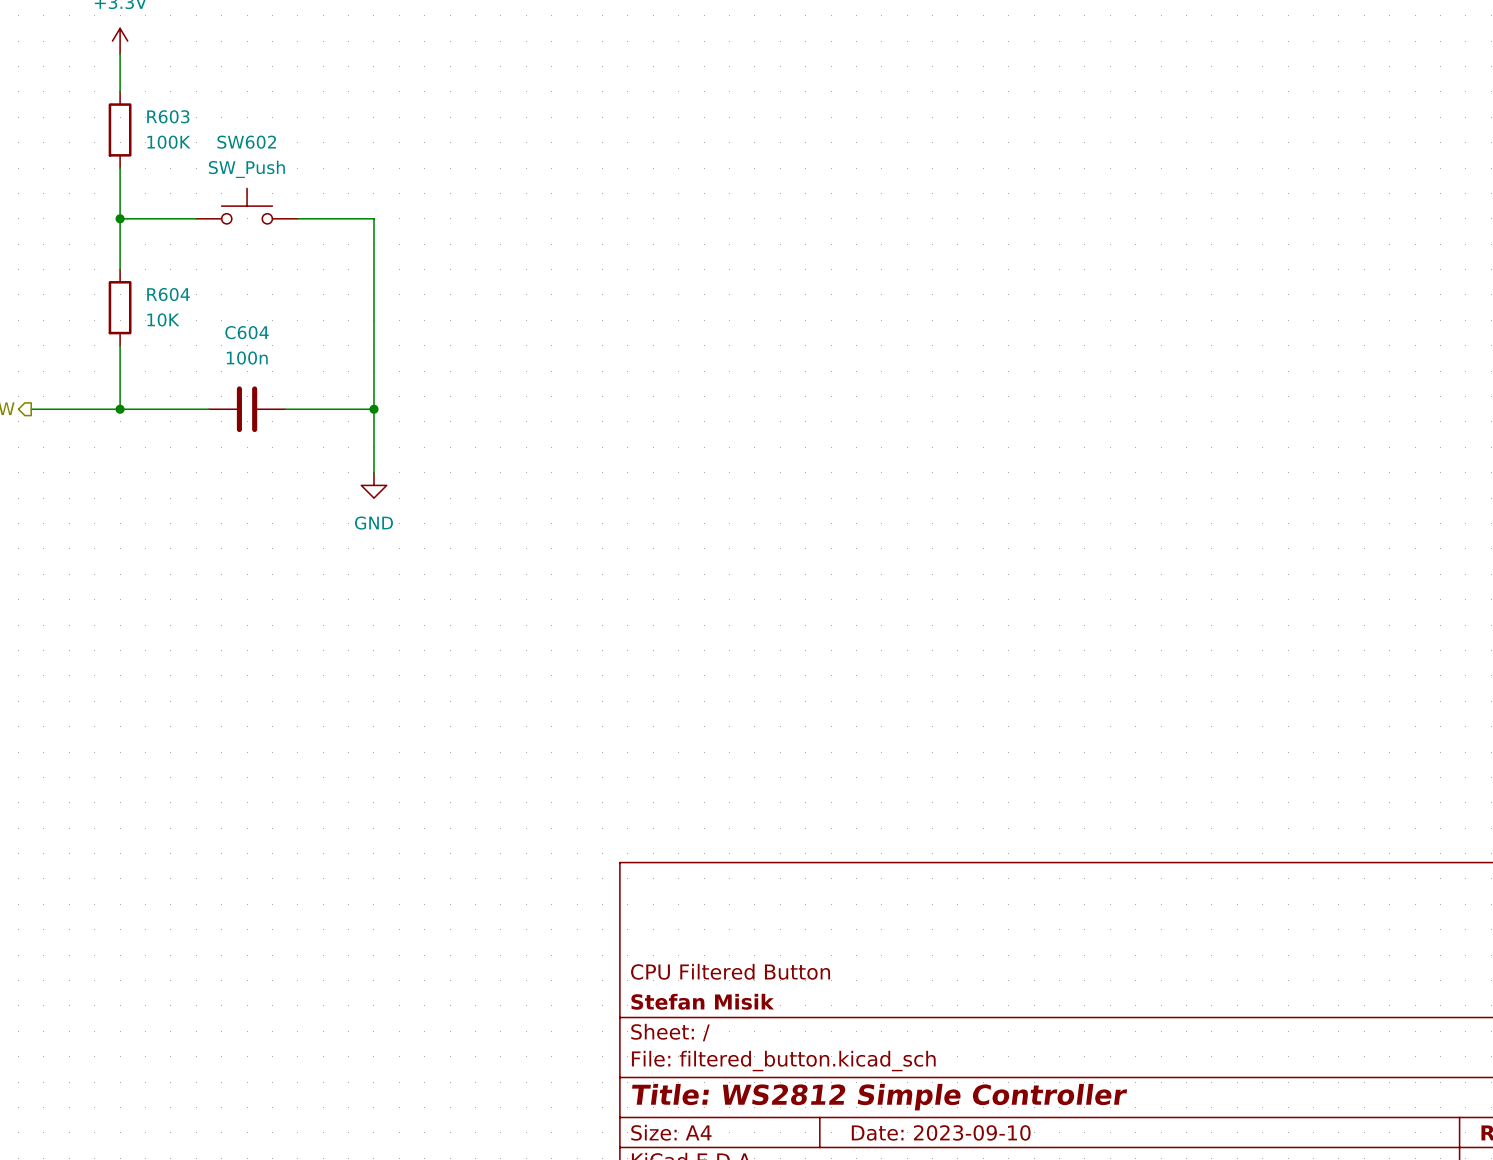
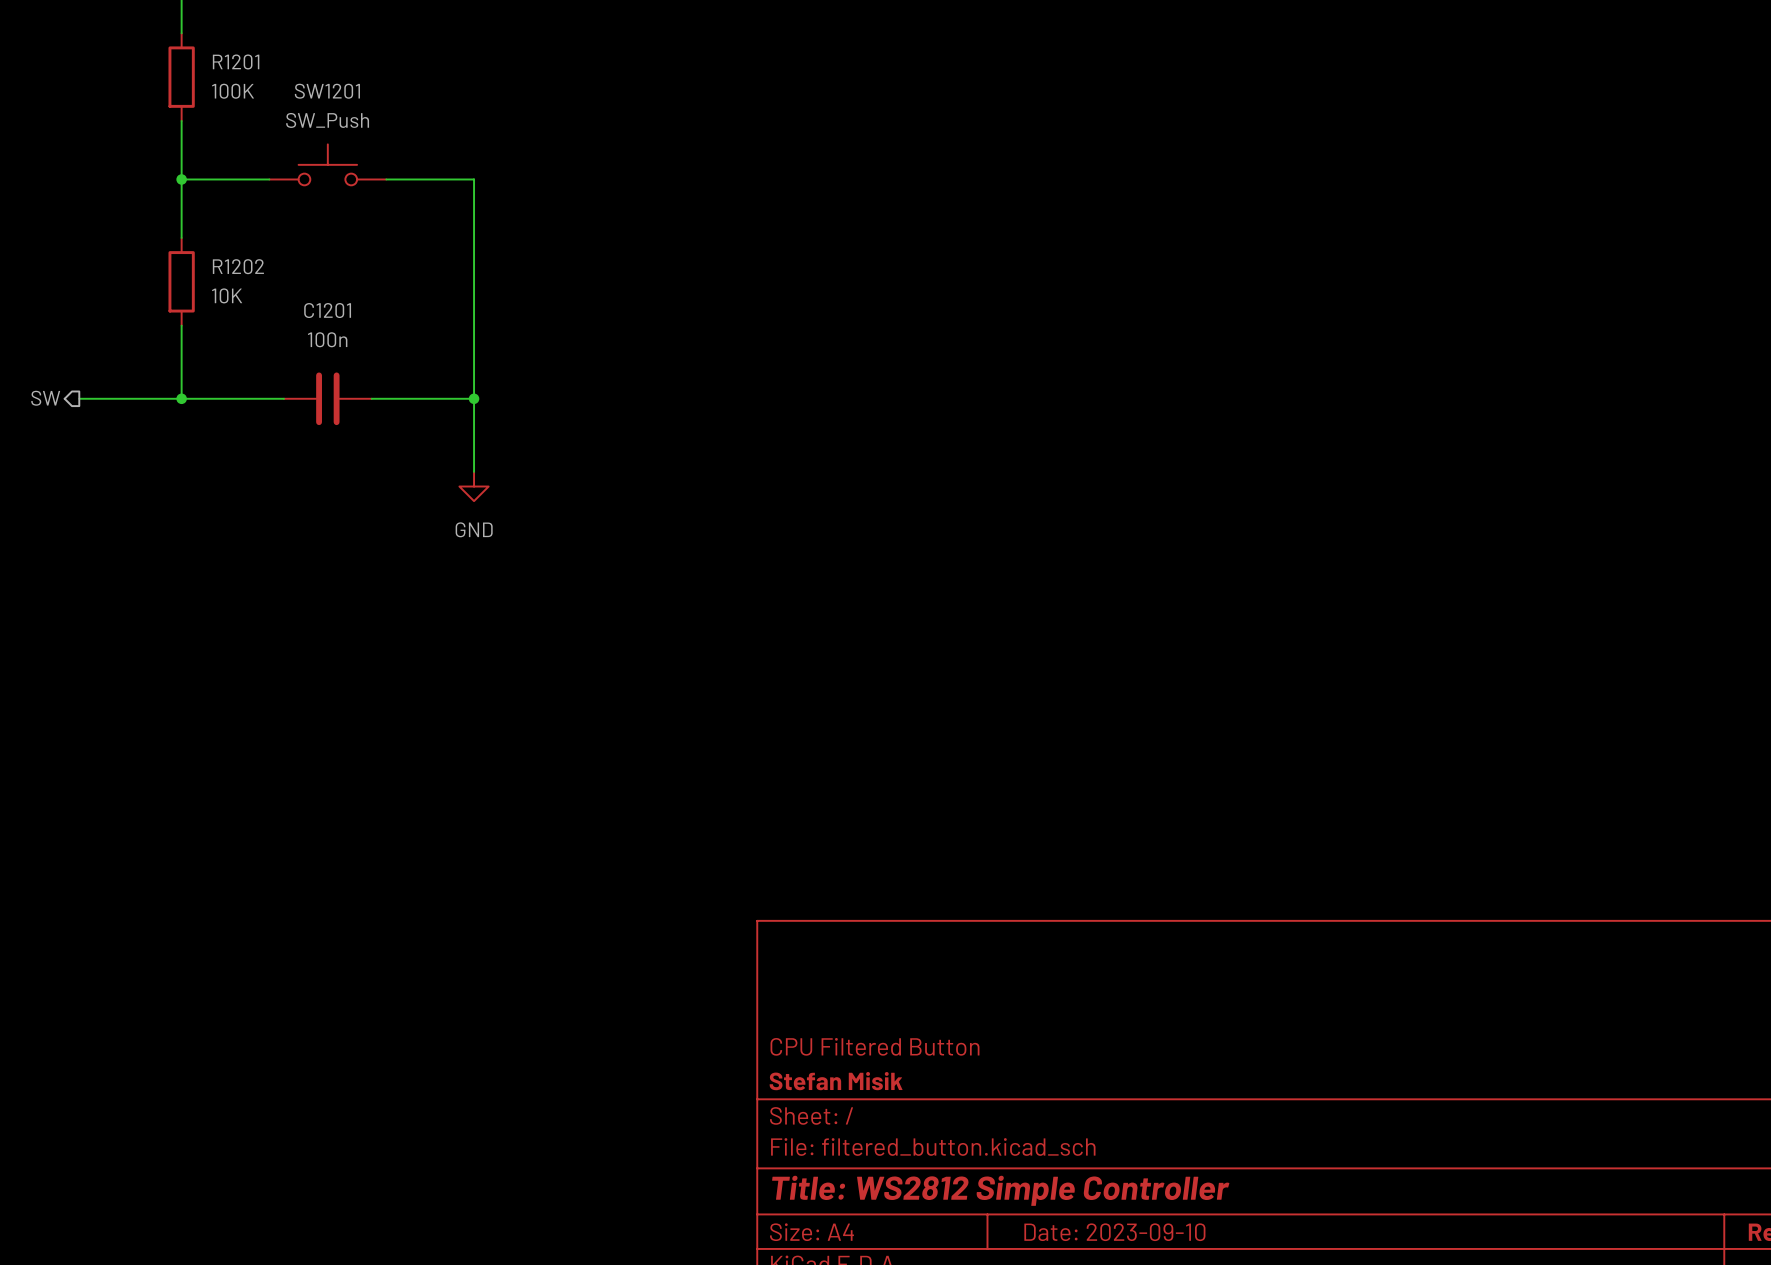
R603 name: R603 (168, 116) -> R1201 (236, 61)
SW602 name: SW602 (246, 142) -> SW1201 (327, 91)
R604 name: R604 (168, 294) -> R1202 (238, 266)
C604 name: C604 (247, 332) -> C1201 (327, 310)

